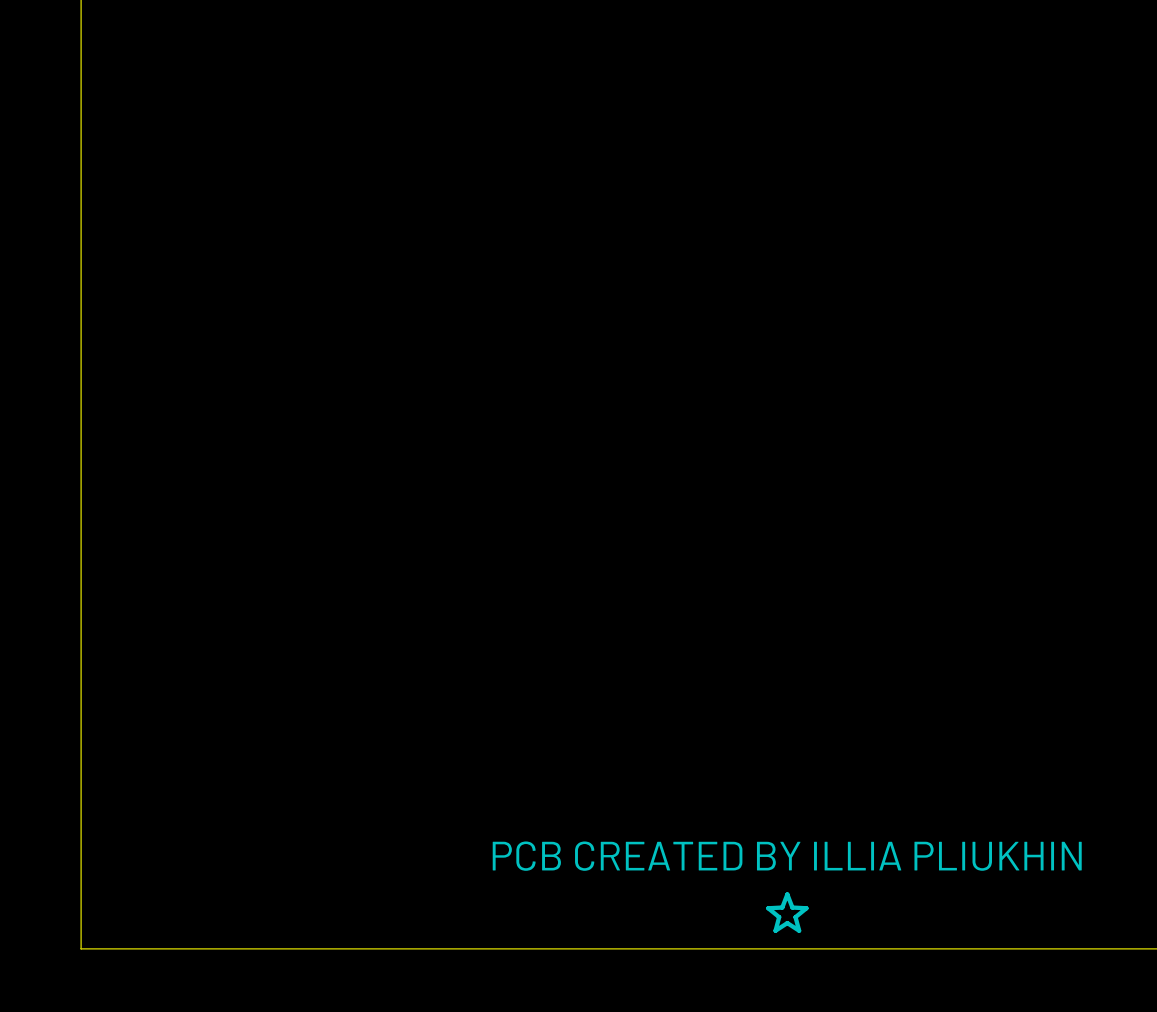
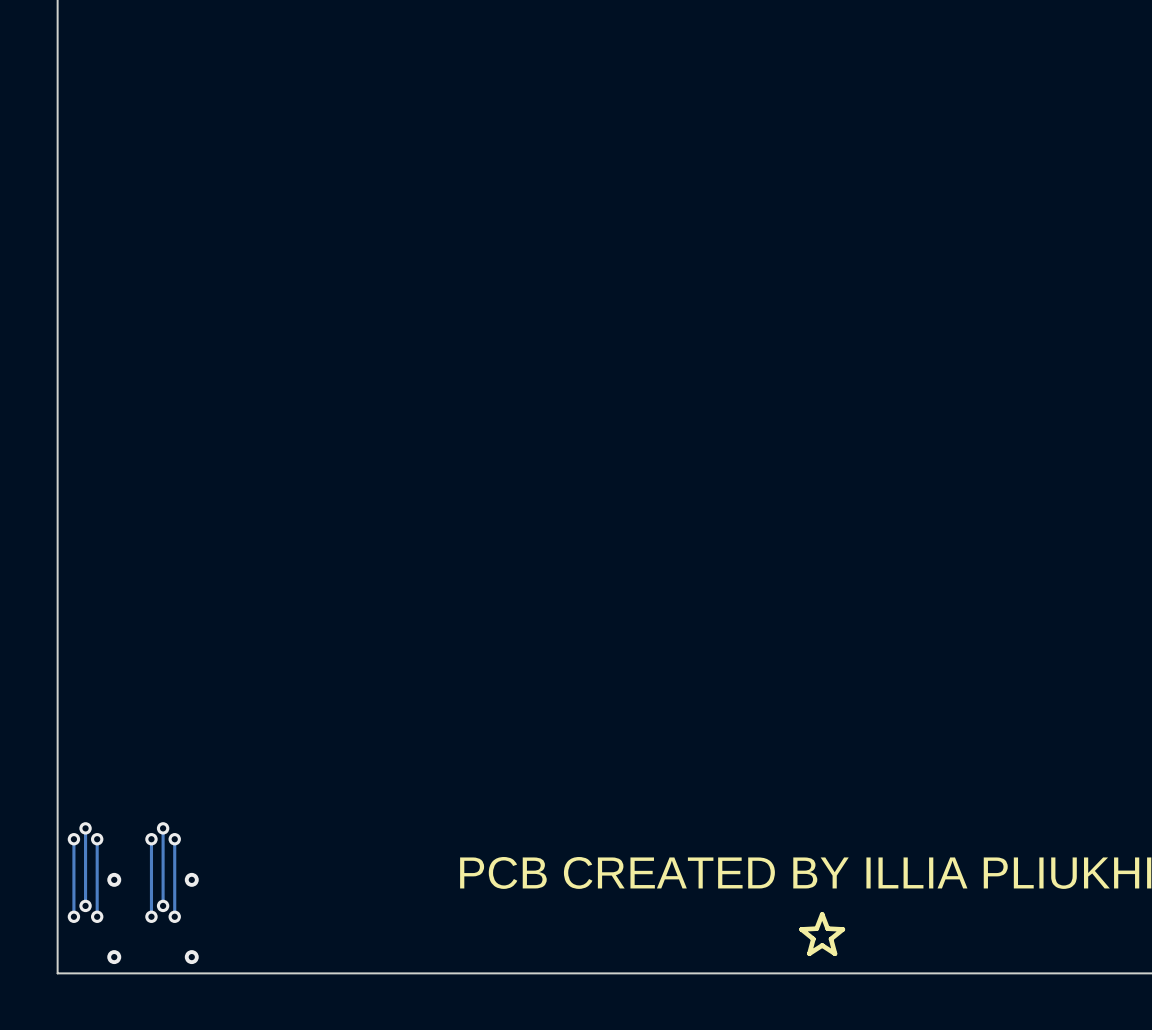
track: none -> (85, 828) (85, 905)
via: none -> (85, 828)
track: none -> (163, 828) (163, 905)
via: none -> (163, 828)
track: none -> (73, 839) (73, 916)
via: none -> (73, 839)
track: none -> (97, 839) (97, 916)
via: none -> (97, 839)
track: none -> (151, 839) (151, 916)
via: none -> (151, 839)
track: none -> (174, 839) (174, 916)
via: none -> (174, 839)
via: none -> (114, 879)
via: none -> (191, 879)
via: none -> (85, 905)
via: none -> (163, 905)
via: none -> (73, 916)
via: none -> (97, 916)
via: none -> (151, 916)
via: none -> (174, 916)
via: none -> (114, 957)
via: none -> (191, 957)

